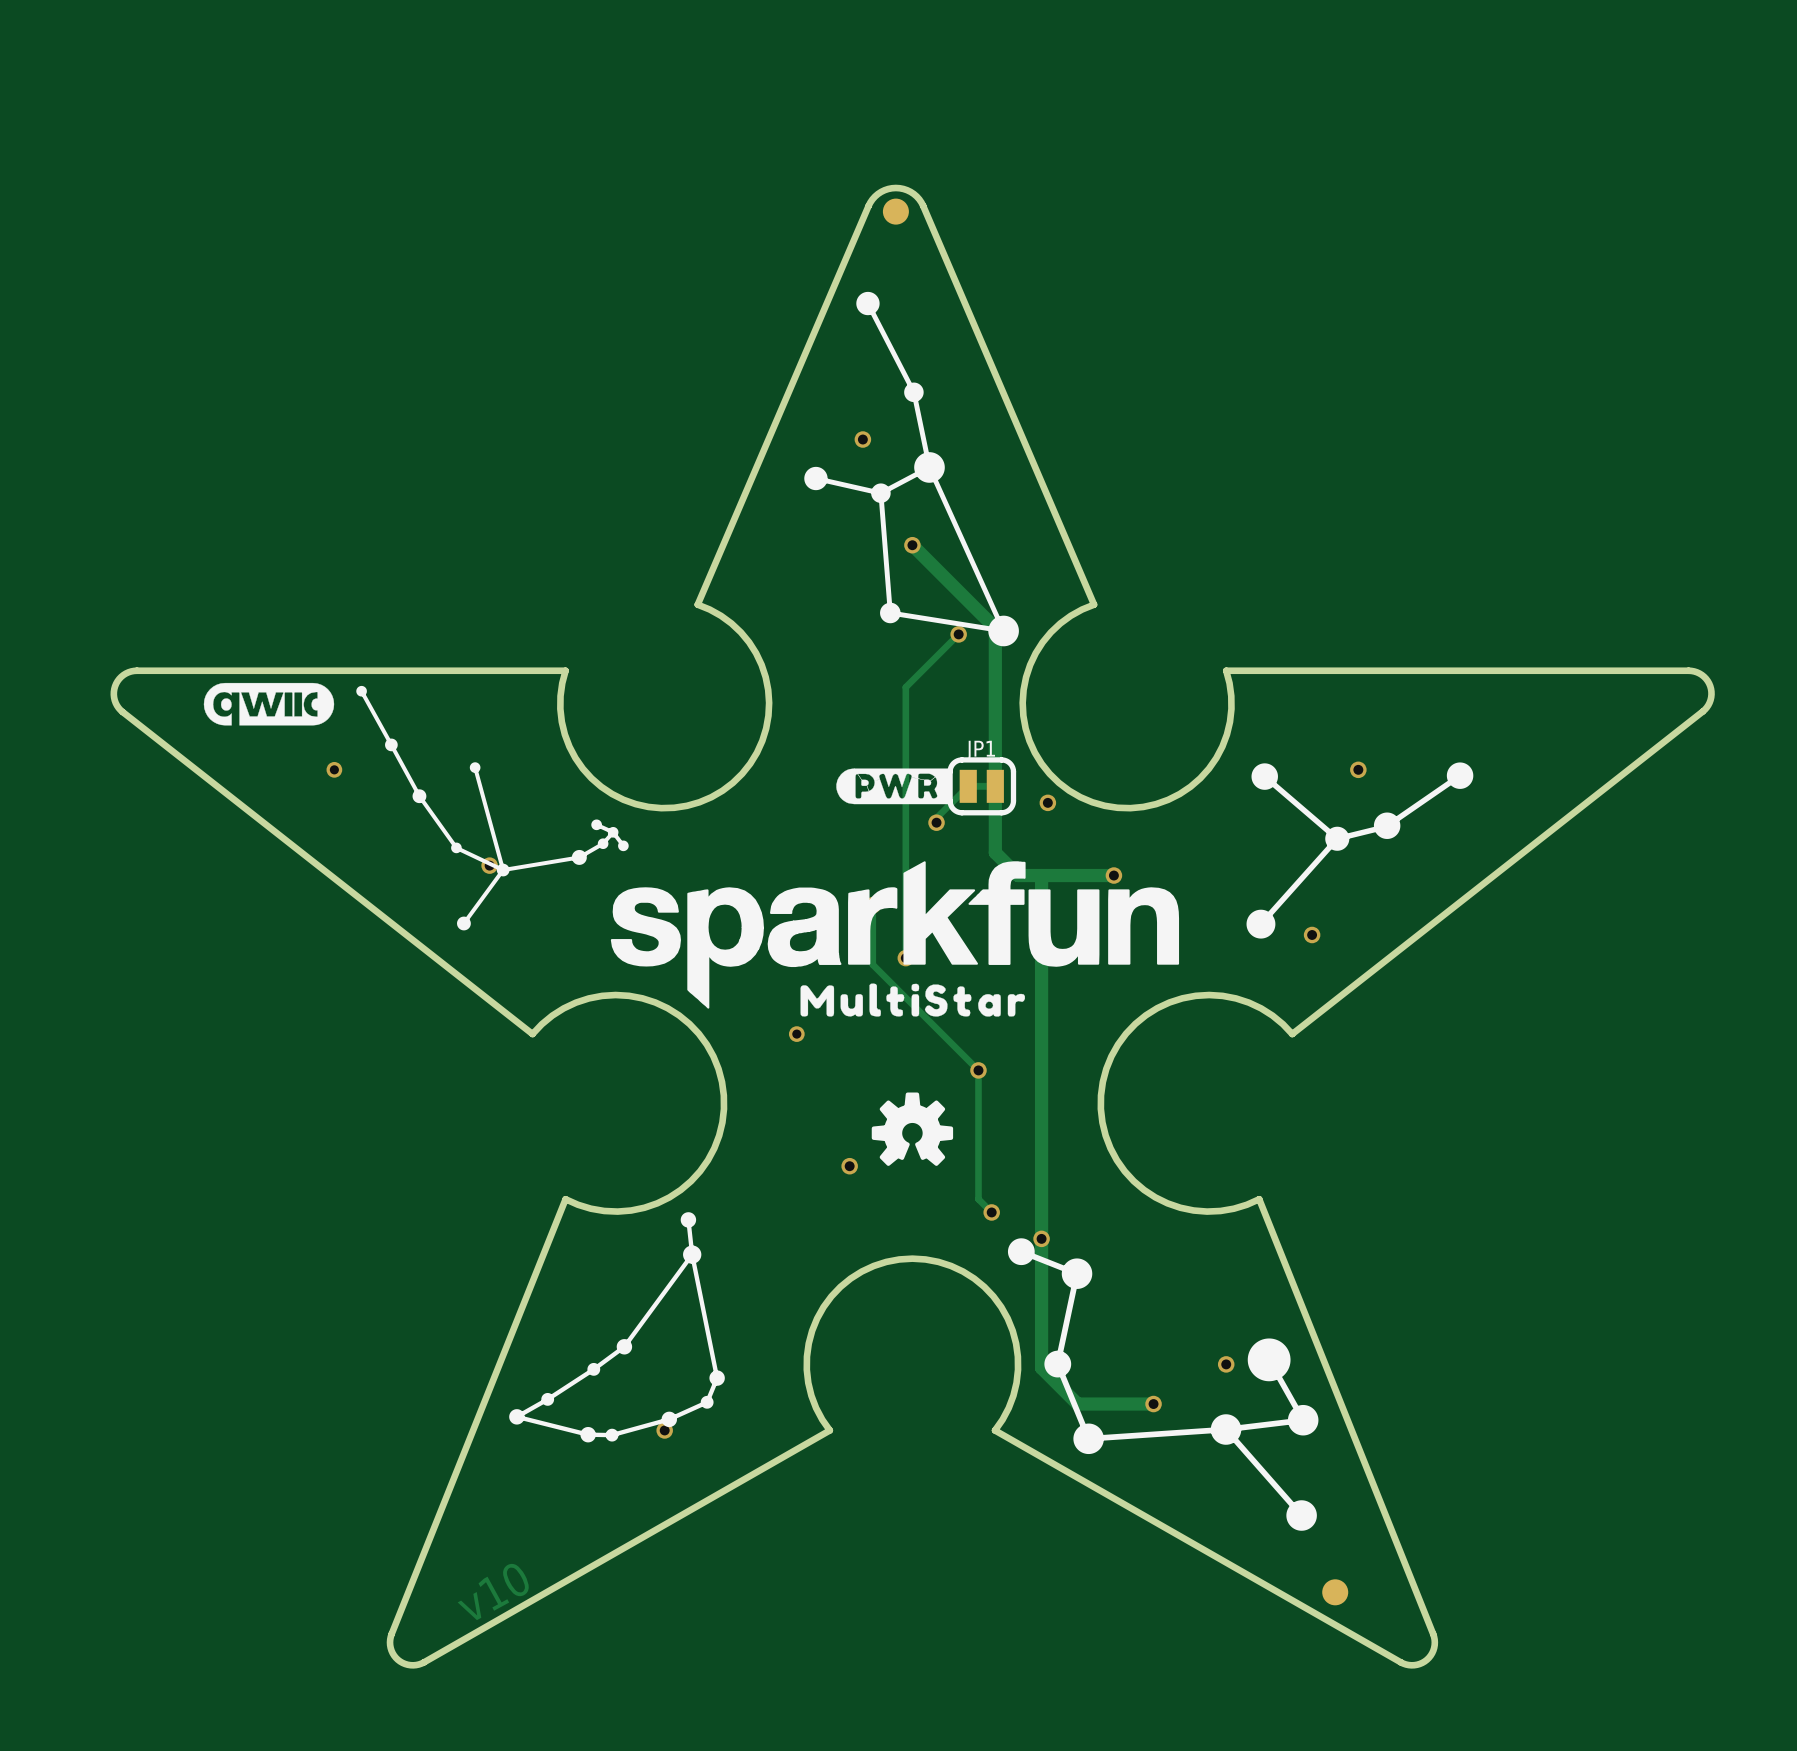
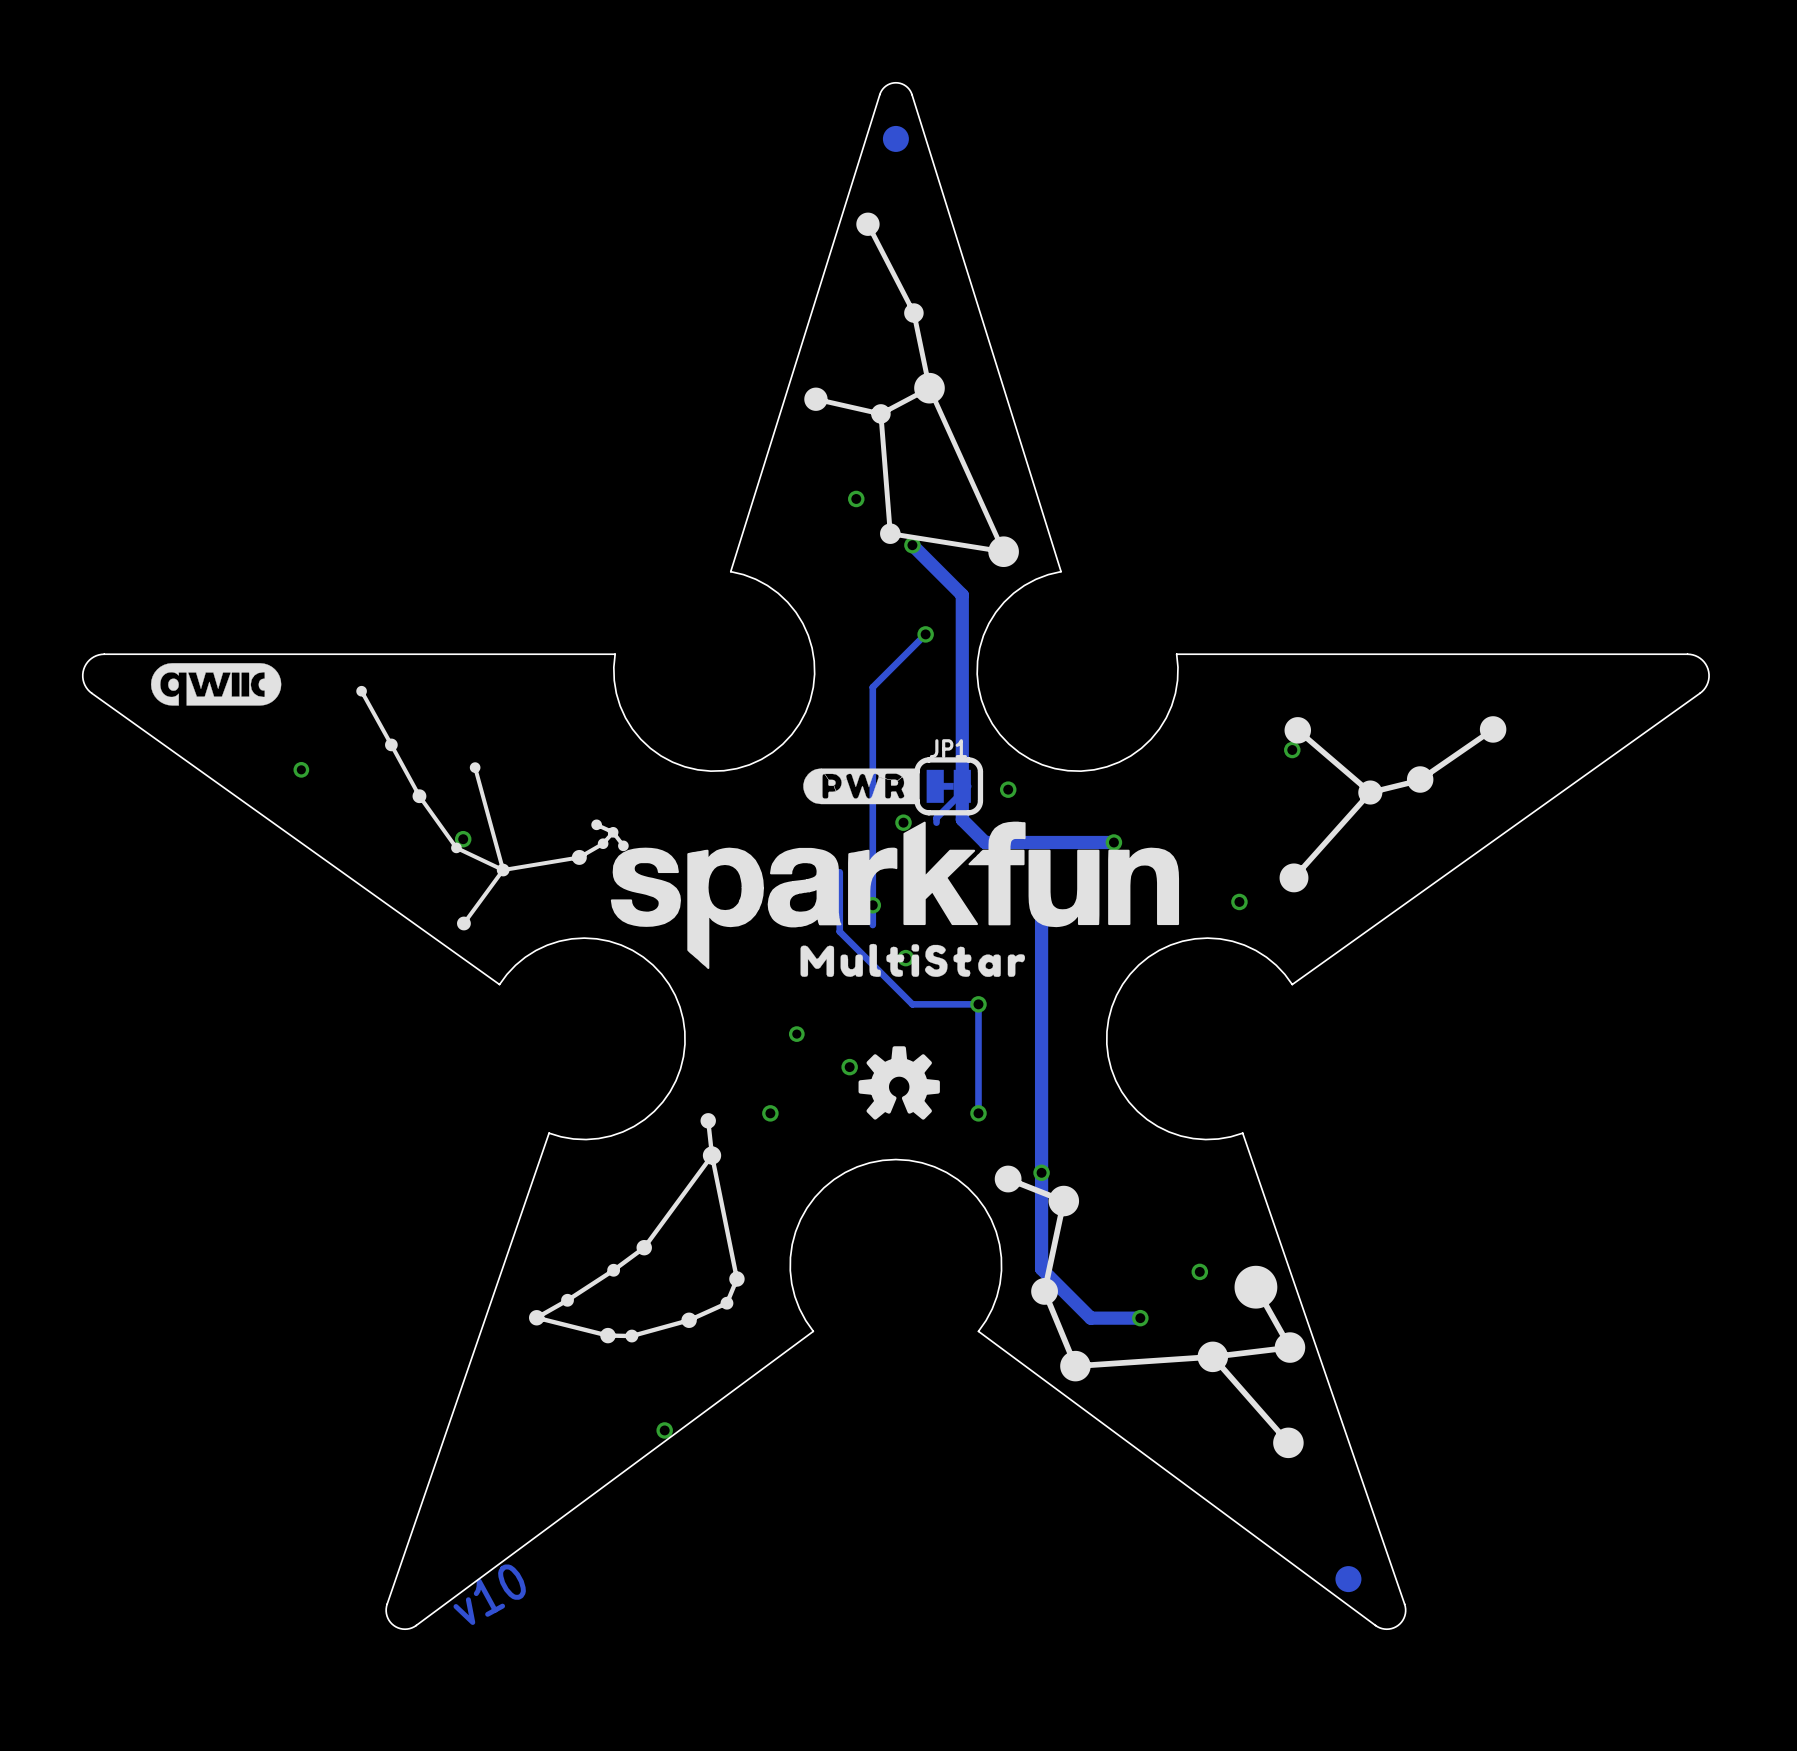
board edge: (923, 206) (1094, 604) (1082, 609) (1060, 623) (1042, 642) (1030, 664) (1023, 689) (1023, 715) (1029, 740) (1034, 752) (1049, 773) (1069, 790) (1080, 797) (1104, 805) (1130, 808) (1143, 806) (1168, 799) (1190, 786) (1208, 768) (1222, 746) (1226, 734) (1231, 709) (1231, 696) (1226, 670) (1688, 670) (1701, 674) (1710, 686) (1710, 700) (1702, 711) (1292, 1034) (1272, 1015) (1248, 1002) (1222, 995) (1195, 995) (1169, 1002) (1145, 1015) (1126, 1033) (1111, 1056) (1106, 1068) (1101, 1095) (1102, 1122) (1105, 1135) (1116, 1160) (1133, 1181) (1144, 1189) (1167, 1203) (1180, 1207) (1207, 1211) (1233, 1208) (1259, 1199) (1433, 1634) (1434, 1642) (1433, 1650) (1429, 1657) (1419, 1663) (1411, 1665) (1400, 1662) (995, 1430) (1008, 1408) (1016, 1382) (1018, 1369) (1016, 1343) (1007, 1318) (993, 1296) (984, 1286) (963, 1271) (938, 1261) (912, 1258) (886, 1261) (861, 1271) (840, 1286) (831, 1296) (817, 1318) (808, 1343) (806, 1369) (808, 1382) (816, 1408) (829, 1430) (424, 1662) (413, 1665) (405, 1663) (395, 1657) (391, 1650) (390, 1642) (391, 1634) (565, 1199) (590, 1208) (617, 1211) (644, 1207) (657, 1203) (680, 1189) (691, 1181) (707, 1160) (719, 1135) (722, 1122) (723, 1095) (718, 1068) (713, 1056) (698, 1033) (679, 1015) (655, 1002) (629, 995) (602, 995) (575, 1002) (552, 1015) (532, 1034) (122, 712) (114, 700) (115, 686) (123, 675) (136, 670) (565, 670) (560, 696) (560, 709) (564, 734) (569, 746) (582, 768) (601, 786) (623, 799) (648, 806) (661, 808) (687, 805) (711, 797) (722, 790) (742, 773) (756, 752) (762, 740) (768, 715) (768, 689) (761, 664) (749, 642) (731, 623) (709, 609) (697, 604) (870, 202) (884, 190) (899, 188) (913, 194) (923, 206) -> (911, 94) (1061, 571) (1035, 579) (1013, 593) (995, 612) (983, 635) (979, 648) (977, 674) (981, 700) (992, 723) (1009, 744) (1019, 752) (1042, 764) (1054, 768) (1081, 771) (1106, 766) (1130, 755) (1151, 739) (1159, 729) (1171, 705) (1177, 680) (1176, 654) (1687, 654) (1700, 658) (1708, 669) (1707, 682) (1700, 693) (1292, 984) (1284, 974) (1266, 957) (1244, 945) (1220, 938) (1195, 938) (1170, 945) (1159, 950) (1138, 965) (1122, 984) (1111, 1006) (1106, 1031) (1108, 1056) (1111, 1068) (1121, 1091) (1137, 1111) (1157, 1126) (1180, 1135) (1193, 1138) (1218, 1138) (1242, 1133) (1404, 1604) (1404, 1615) (1399, 1624) (1391, 1628) (1382, 1628) (1375, 1625) (978, 1331) (992, 1308) (1000, 1283) (1001, 1270) (999, 1244) (991, 1219) (976, 1197) (967, 1187) (946, 1172) (922, 1162) (895, 1159) (869, 1162) (845, 1172) (823, 1187) (814, 1197) (800, 1219) (792, 1244) (790, 1270) (791, 1283) (799, 1308) (813, 1331) (416, 1625) (407, 1629) (398, 1627) (387, 1618) (387, 1604) (549, 1133) (573, 1138) (598, 1138) (610, 1135) (634, 1126) (654, 1111) (670, 1091) (680, 1068) (683, 1056) (684, 1031) (679, 1006) (669, 984) (652, 965) (632, 950) (621, 945) (596, 938) (571, 938) (547, 945) (525, 957) (506, 974) (499, 984) (91, 693) (83, 682) (83, 669) (91, 658) (104, 654) (615, 654) (614, 680) (620, 705) (632, 729) (640, 739) (661, 755) (684, 766) (710, 771) (736, 768) (749, 764) (772, 752) (782, 744) (799, 723) (810, 700) (814, 674) (812, 648) (808, 635) (795, 612) (778, 593) (755, 579) (730, 571) (879, 94) (885, 86) (895, 82) (905, 86) (911, 94)
part position: (895, 211) -> (895, 138)
via position: (862, 439) -> (856, 498)
drawing position: (911, 469) -> (911, 389)
track: (962, 595) (995, 628) (995, 852) (1018, 875) (1113, 875) -> (962, 595) (962, 819) (985, 842) (1113, 842)
track: none -> (925, 634) (872, 687) (872, 905)
track: (958, 634) (905, 687) (905, 958) -> none
via position: (958, 634) -> (925, 634)
drawing position: (268, 704) -> (216, 684)
via position: (334, 769) -> (301, 769)
via position: (1358, 769) -> (1292, 750)
drawing position: (893, 786) -> (860, 786)
JP1 position: (981, 786) -> (948, 786)
via: none -> (1008, 789)
via: (1047, 802) -> none
via position: (936, 822) -> (903, 822)
drawing position: (1359, 850) -> (1392, 804)
via position: (489, 865) -> (463, 839)
via position: (1113, 875) -> (1113, 842)
via: none -> (1239, 901)
track: (872, 925) (872, 964) -> (839, 872) (839, 931) (872, 964)
drawing position: (894, 934) -> (894, 895)
via: (1312, 934) -> none
drawing position: (912, 1000) -> (912, 960)
track: (912, 1004) (978, 1070) -> (912, 1004) (978, 1004) (978, 1070)
via: none -> (978, 1004)
via: none -> (849, 1067)
via: (978, 1070) -> none
via: none -> (770, 1113)
track: (978, 1113) (978, 1199) (991, 1212) -> none
via: none -> (978, 1113)
drawing position: (912, 1129) -> (899, 1082)
via: (849, 1166) -> none
via: none -> (1041, 1172)
via: (991, 1212) -> none
via: (1041, 1238) -> none
track: (1041, 1268) (1041, 1368) (1077, 1404) (1153, 1404) -> (1041, 1268) (1090, 1318) (1140, 1318)
via: none -> (1199, 1271)
via: none -> (1140, 1318)
drawing position: (617, 1327) -> (636, 1228)
via: (1226, 1364) -> none
drawing position: (1163, 1384) -> (1149, 1311)
via: (1153, 1404) -> none
part position: (1335, 1592) -> (1348, 1579)

